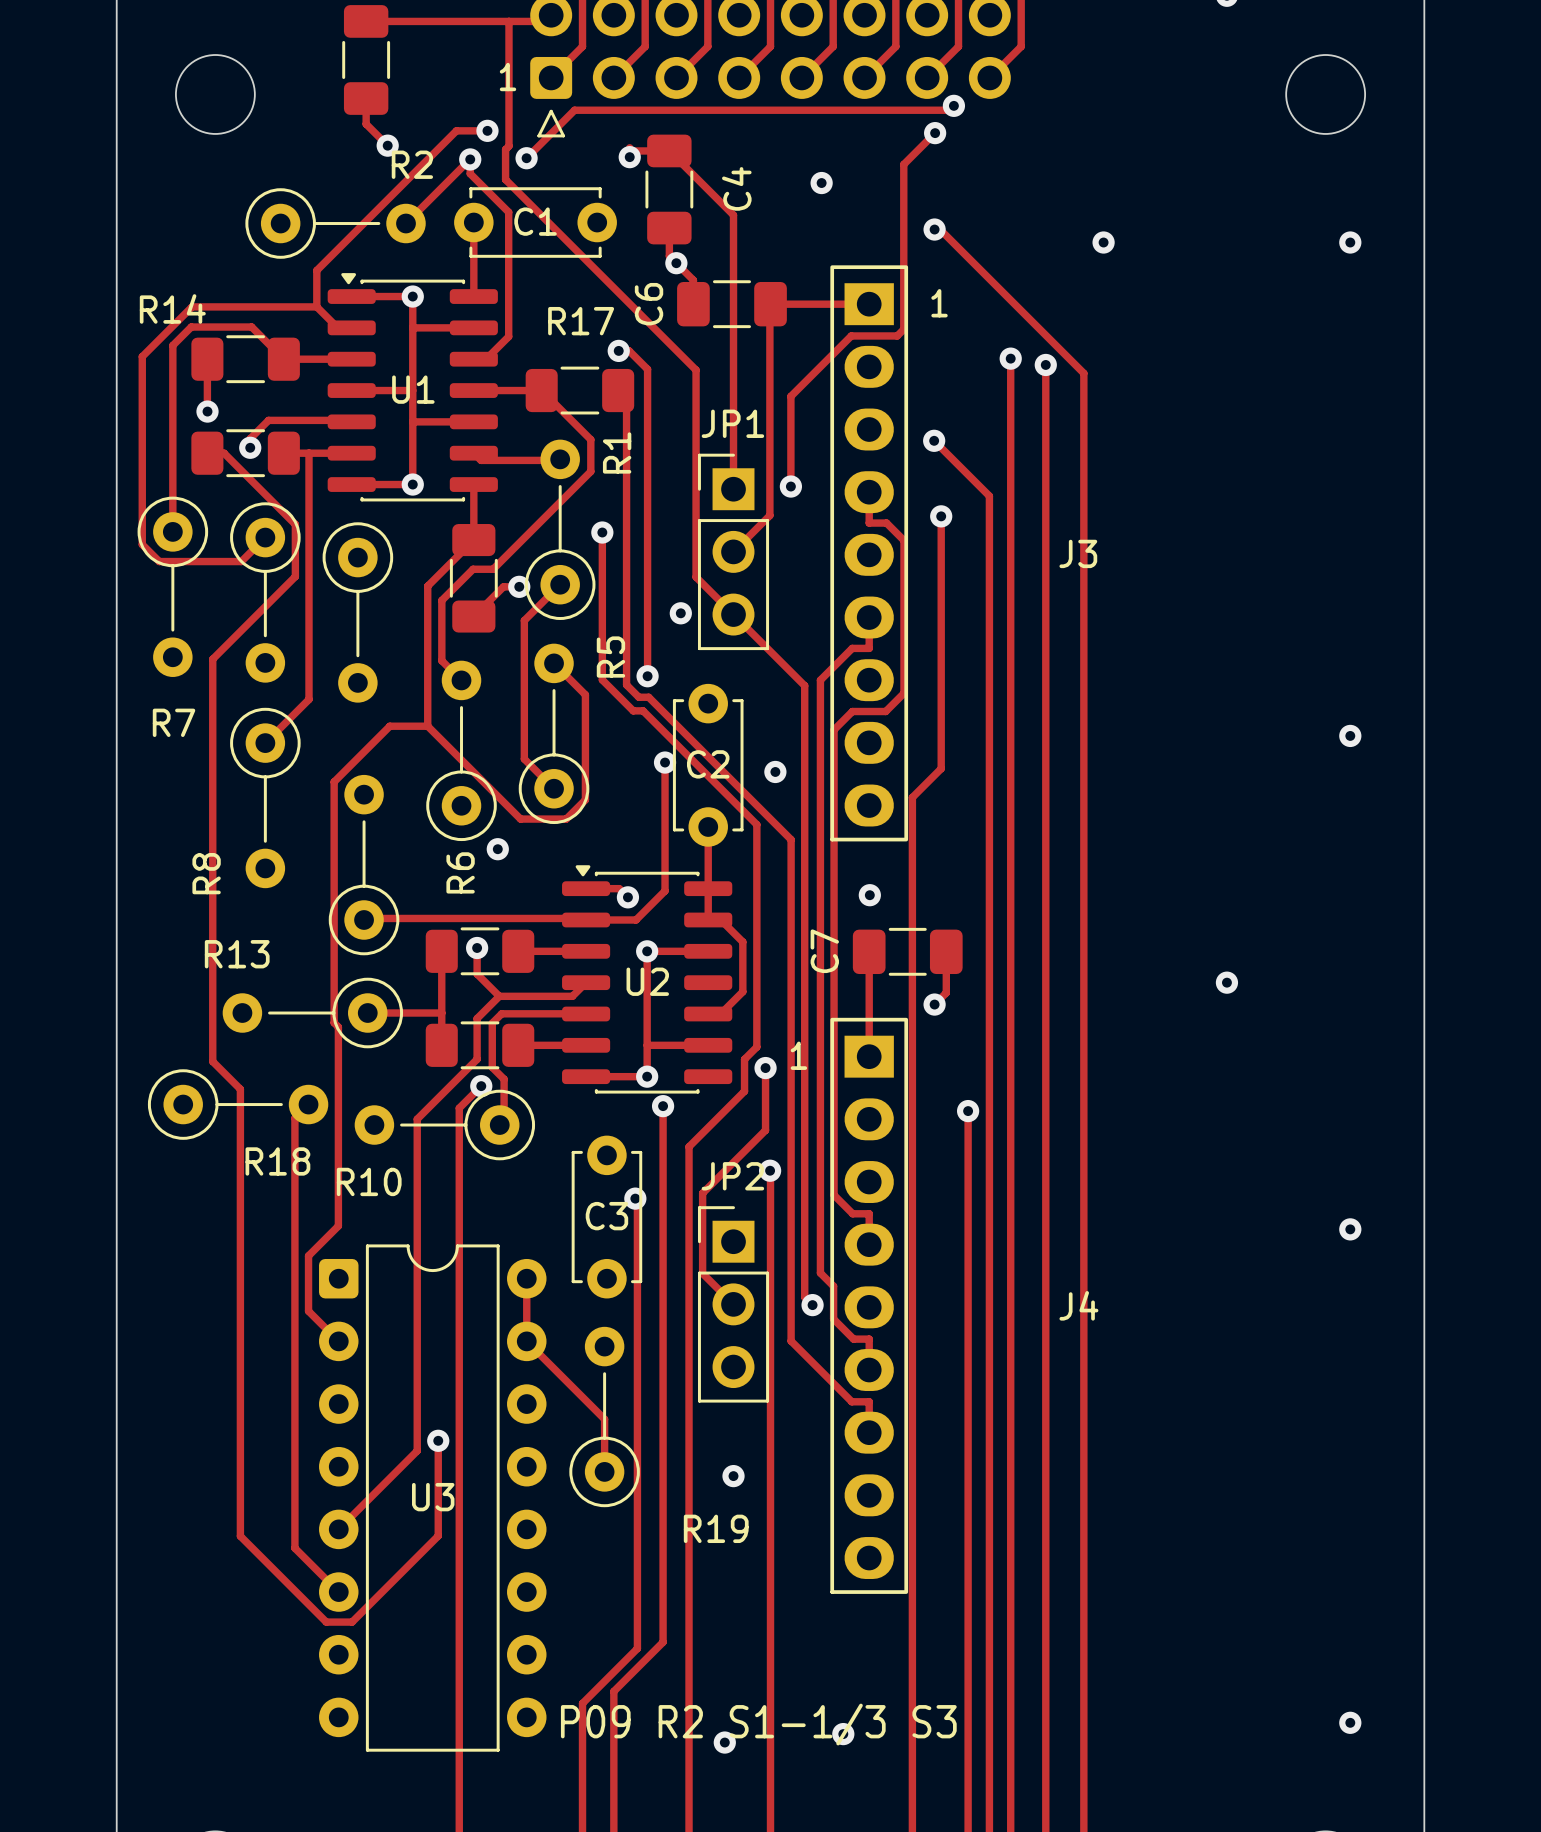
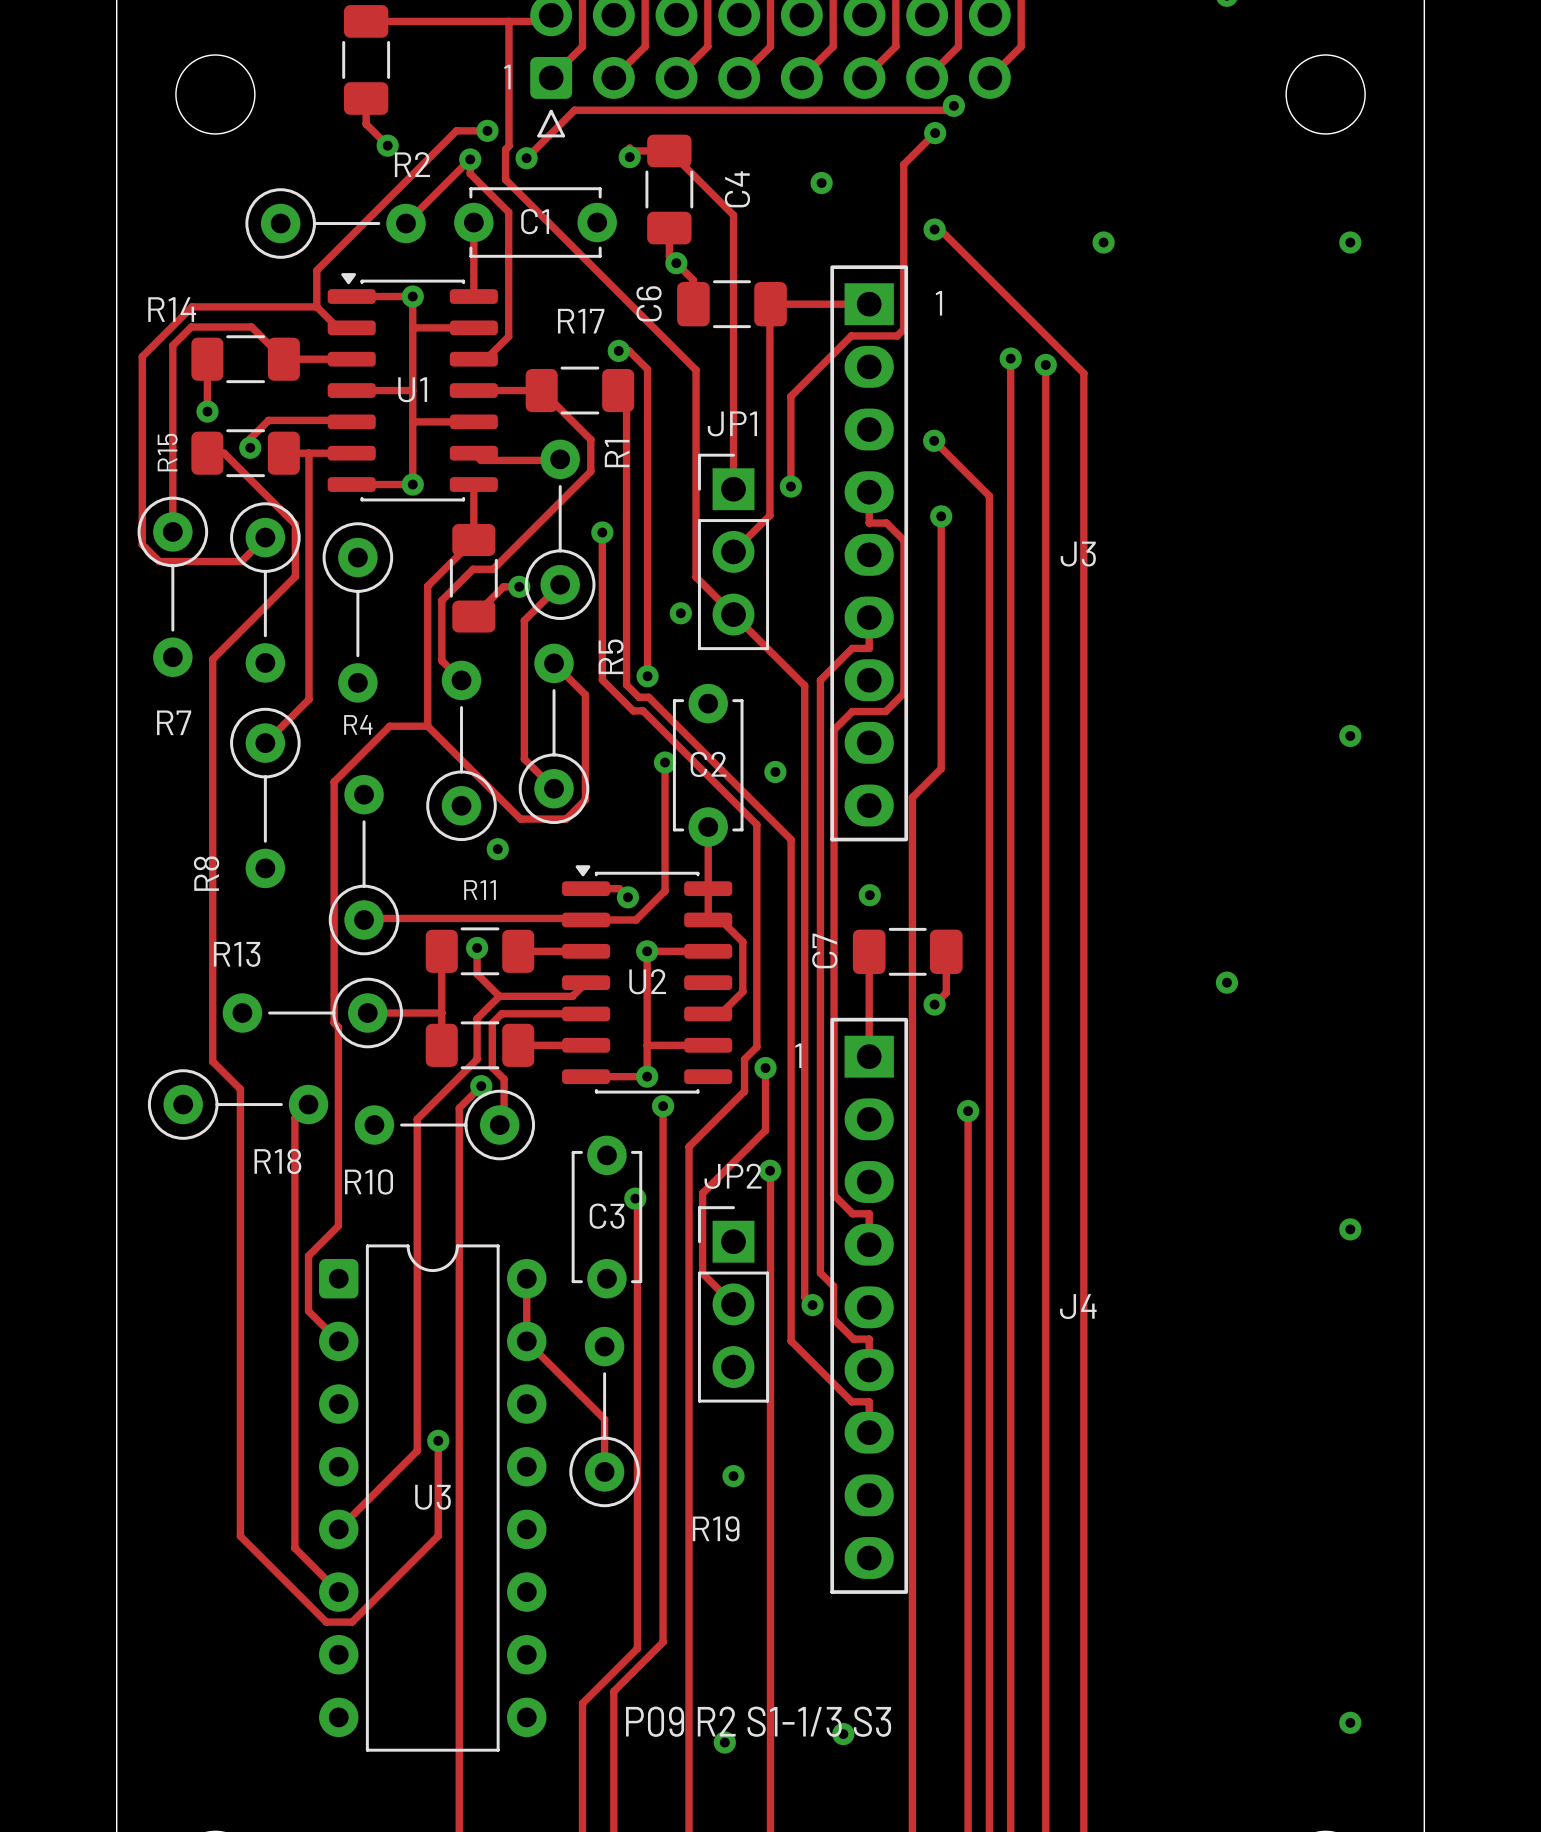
R15 name: none -> R15 (167, 452)
R4 name: none -> R4 (358, 724)
R6 name: R6 (460, 872) -> none
R11 name: none -> R11 (480, 890)

